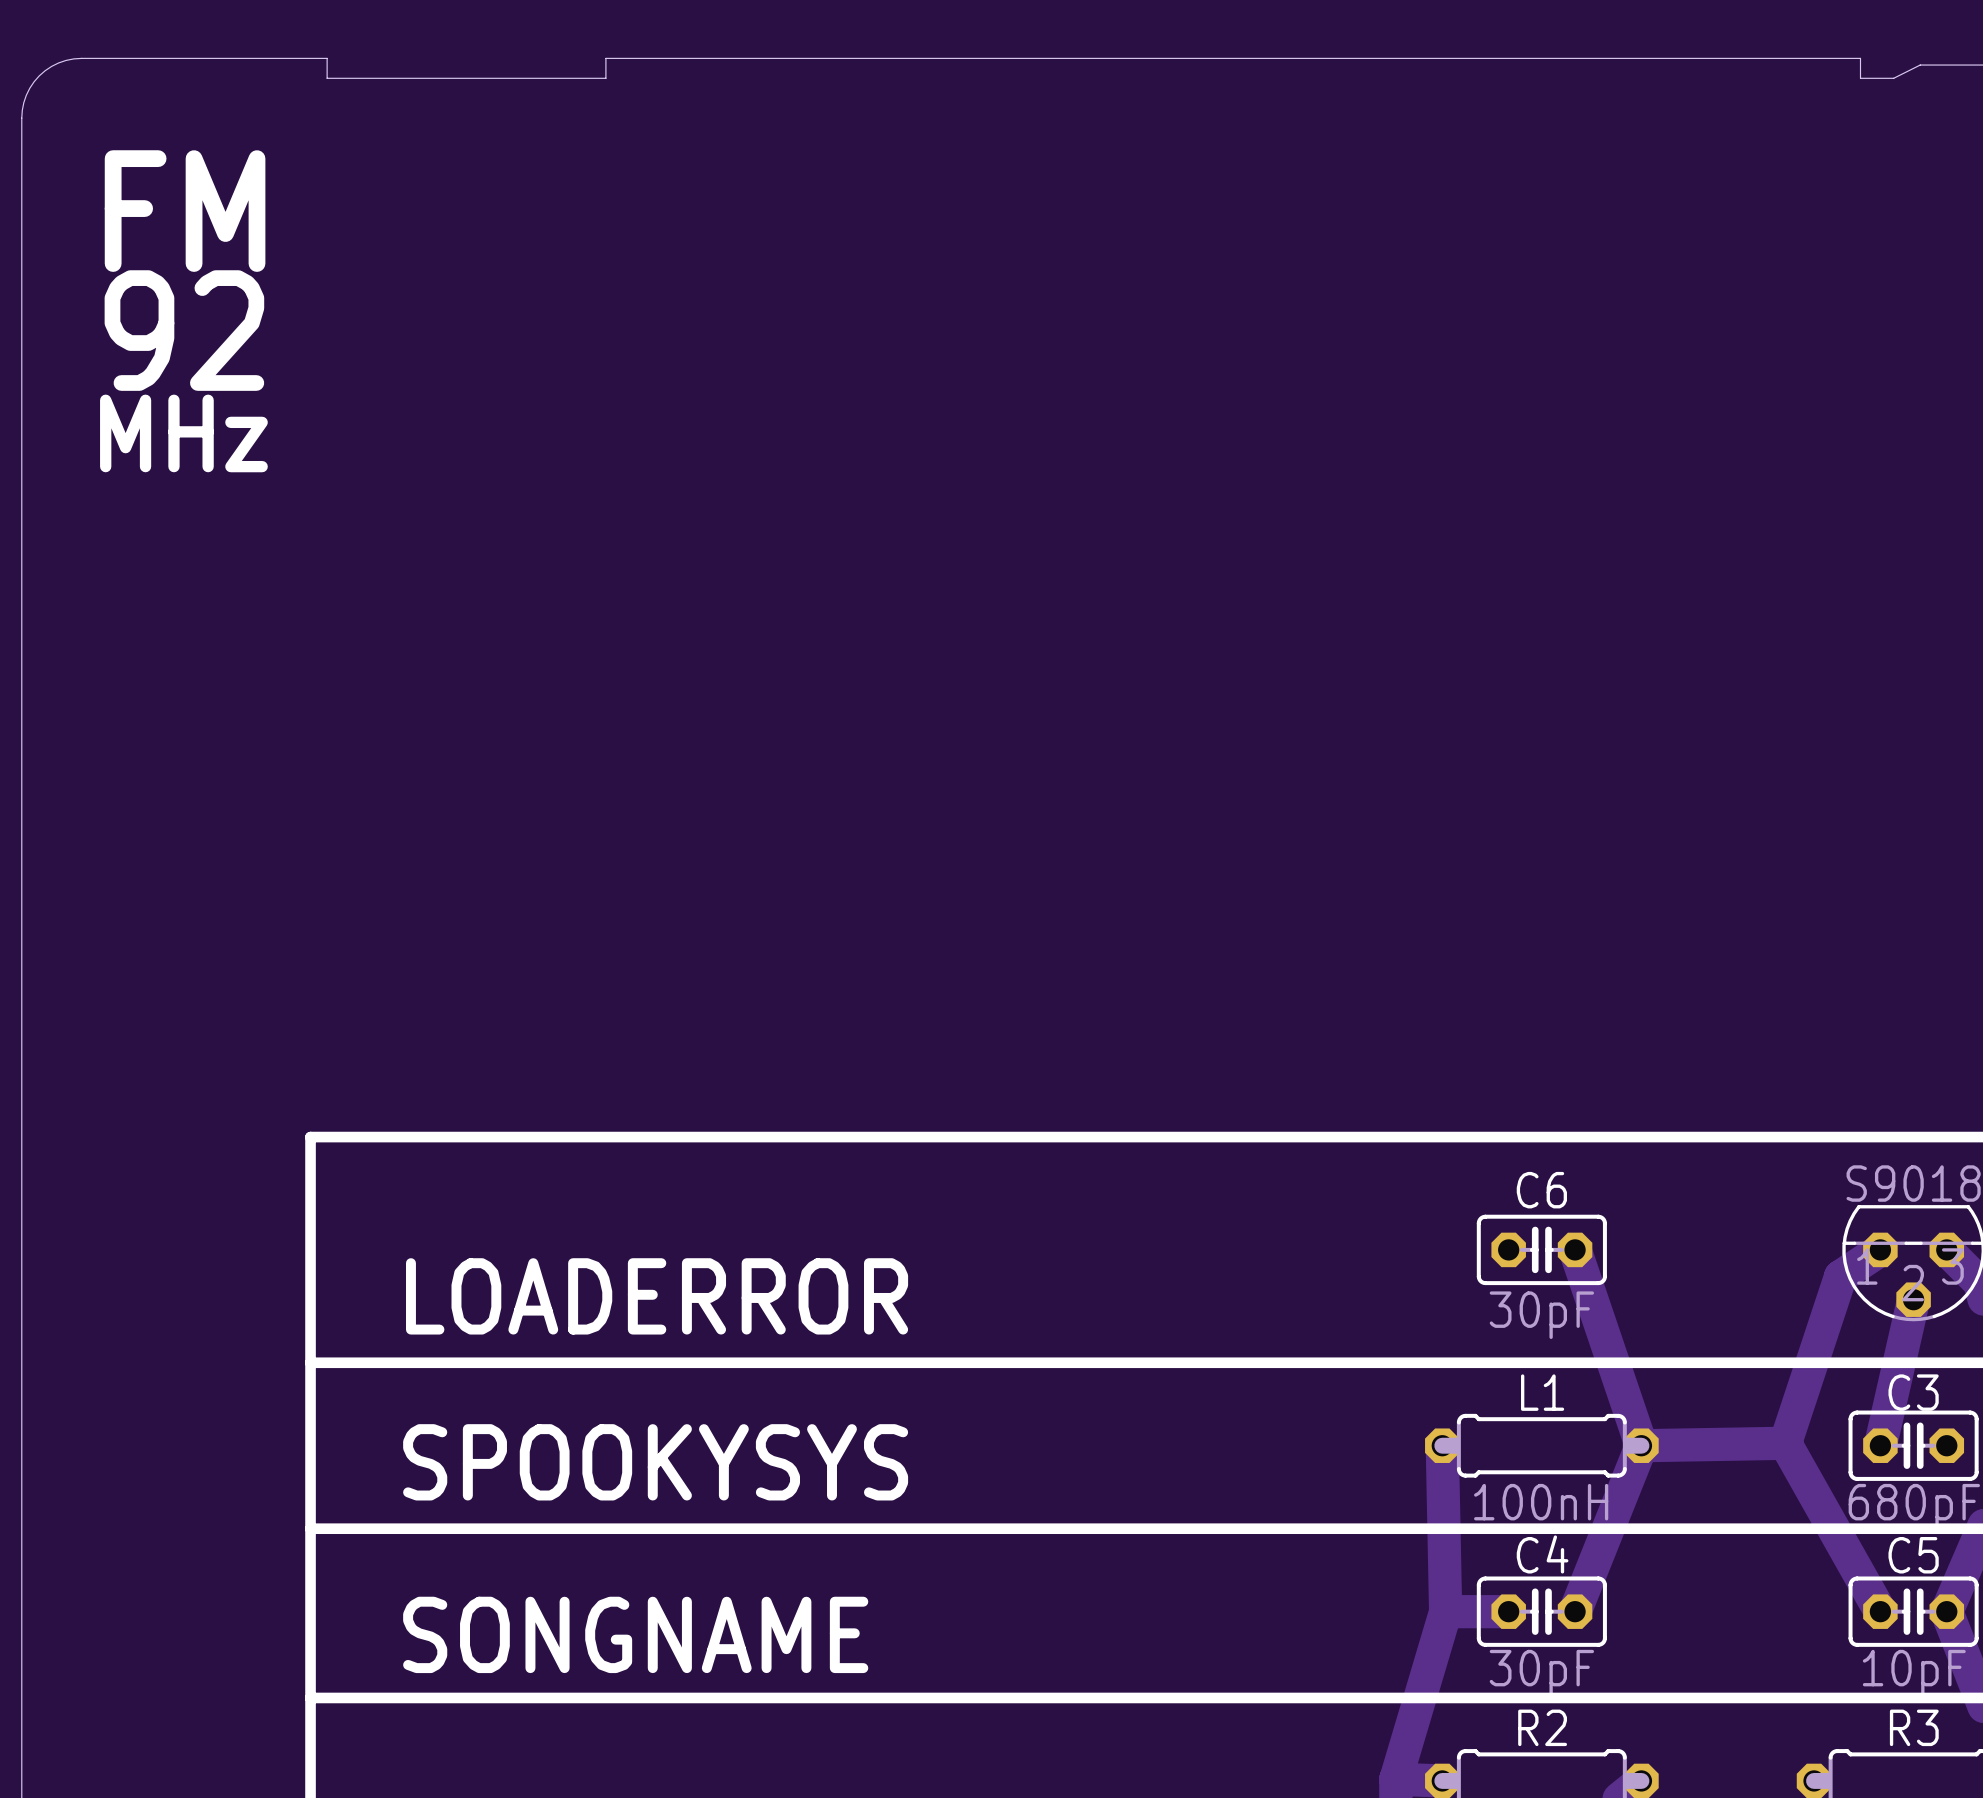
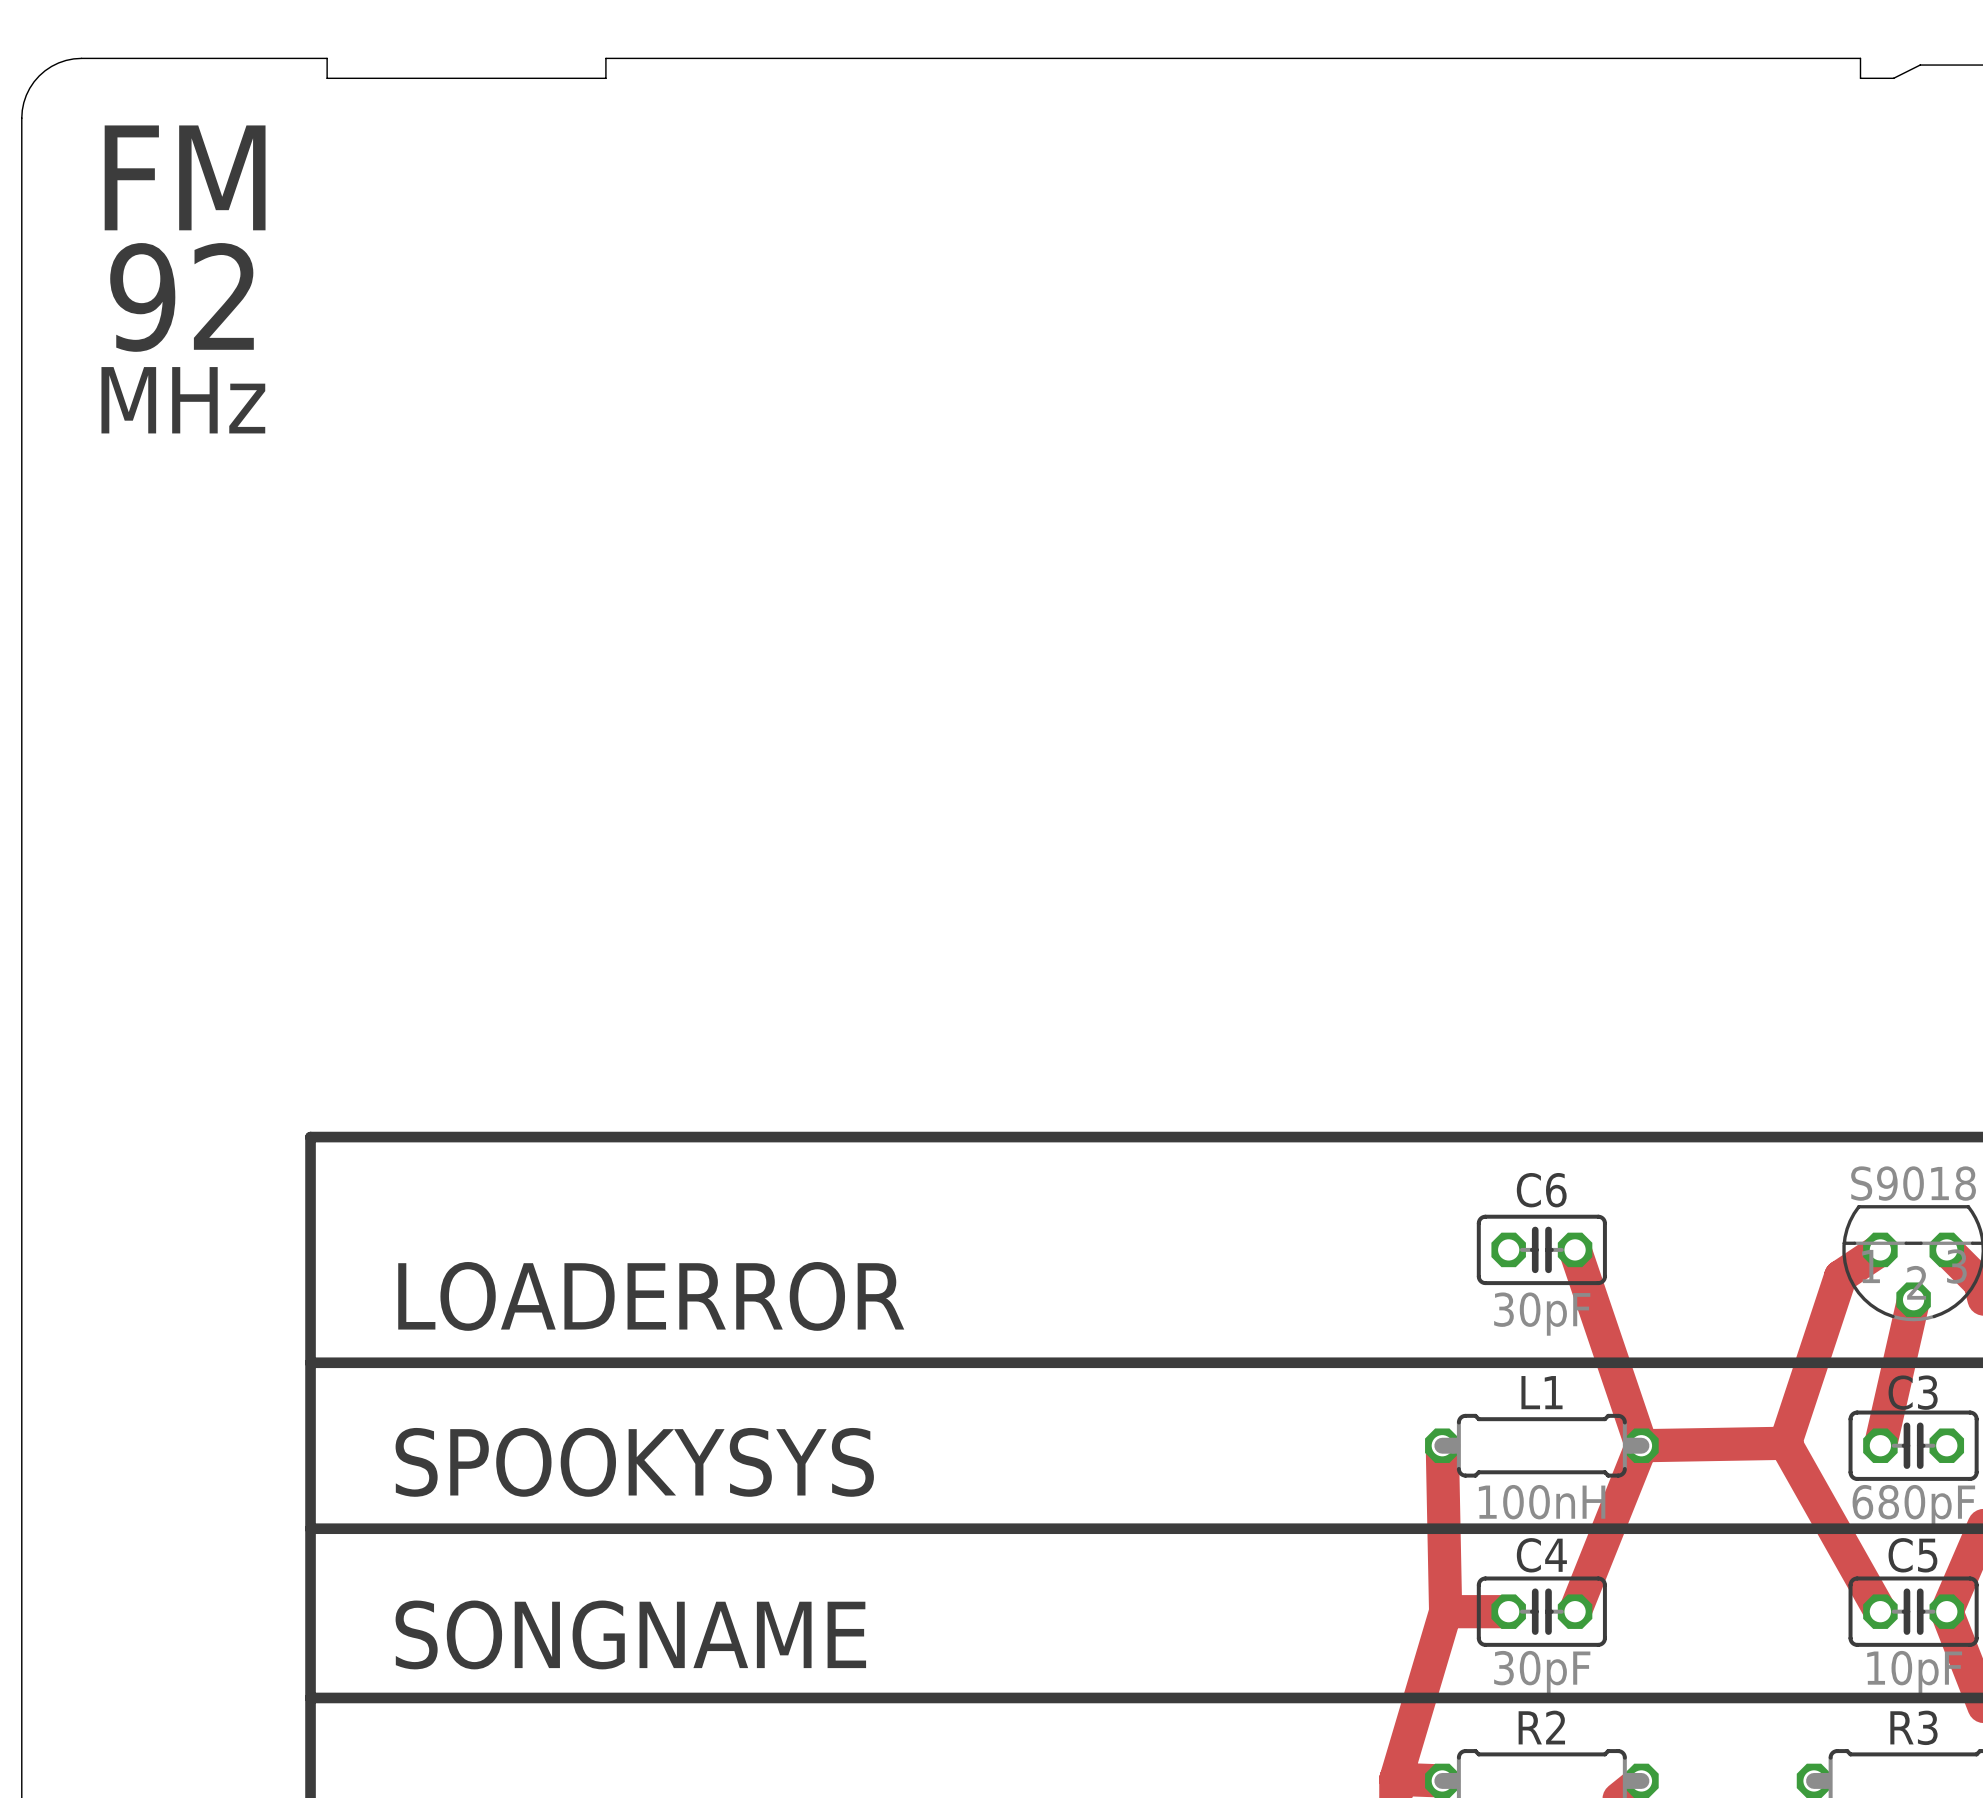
text position: FM (185, 211) -> FM (185, 177)
text position: 92 (184, 330) -> 92 (182, 297)
text position: MHz (183, 433) -> MHz (183, 400)

